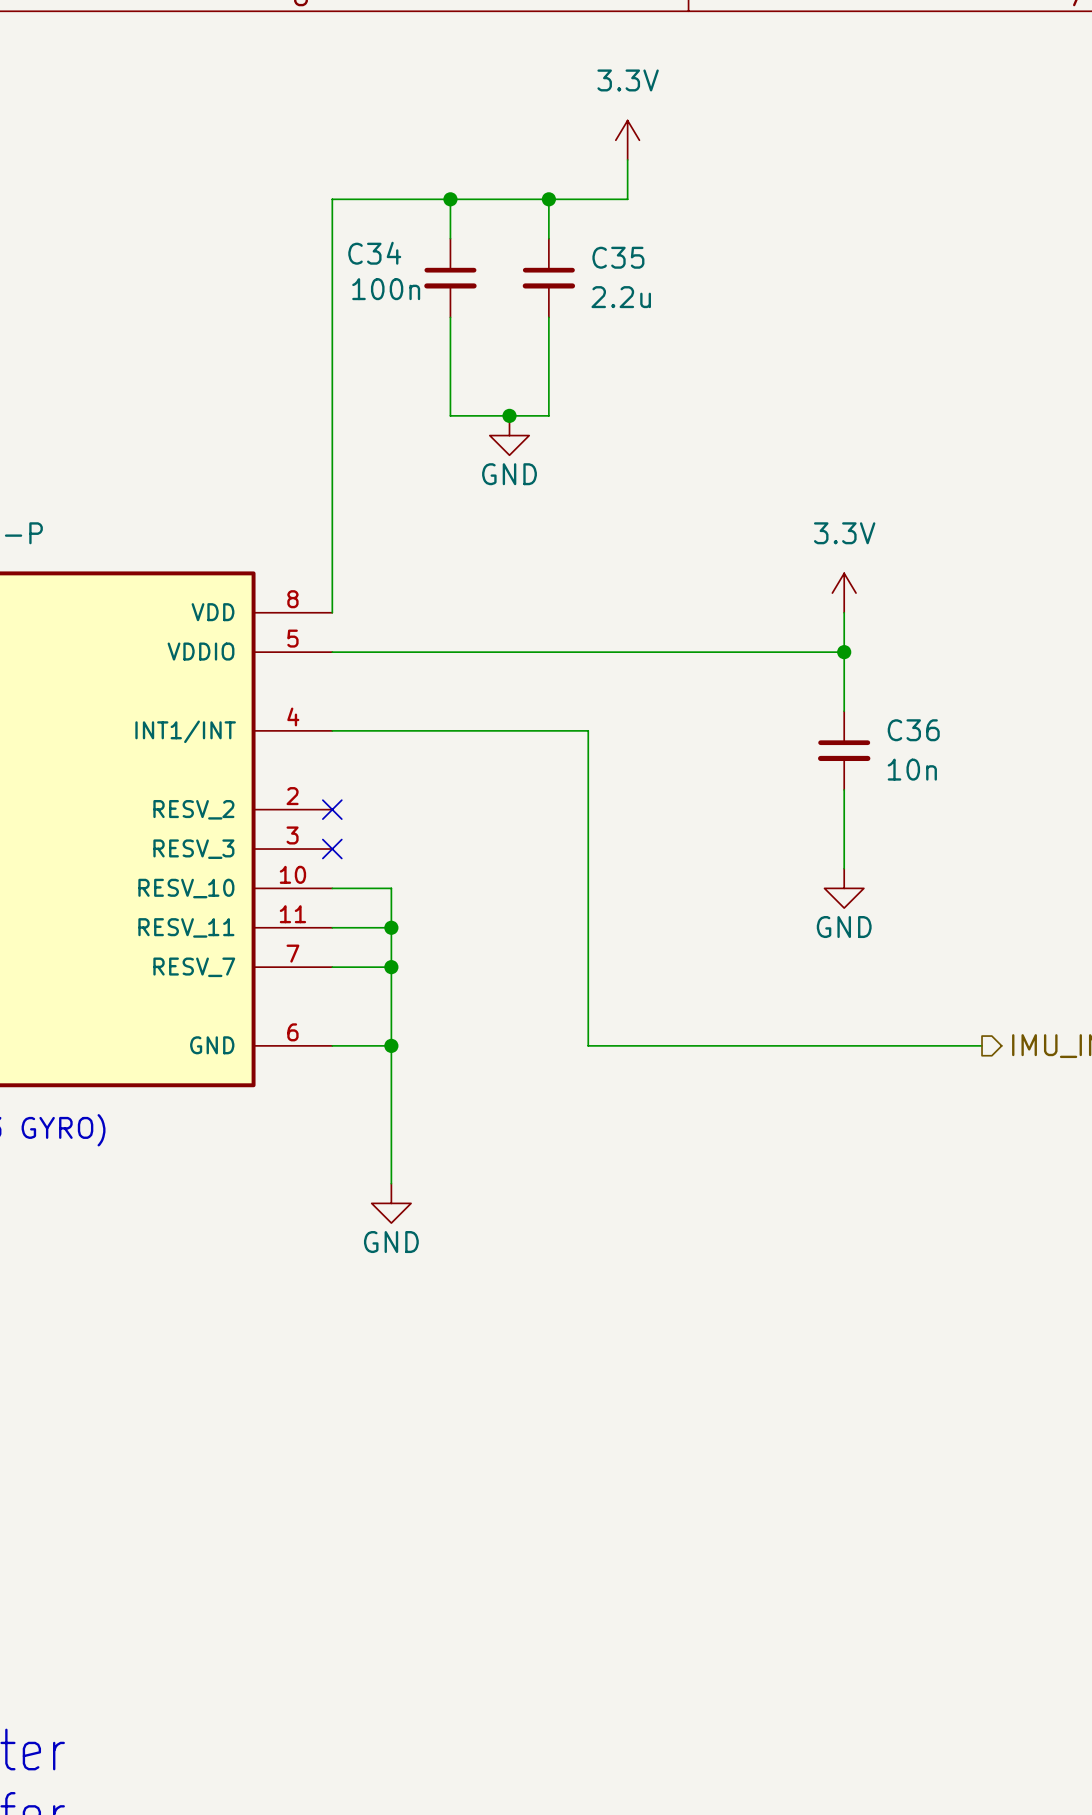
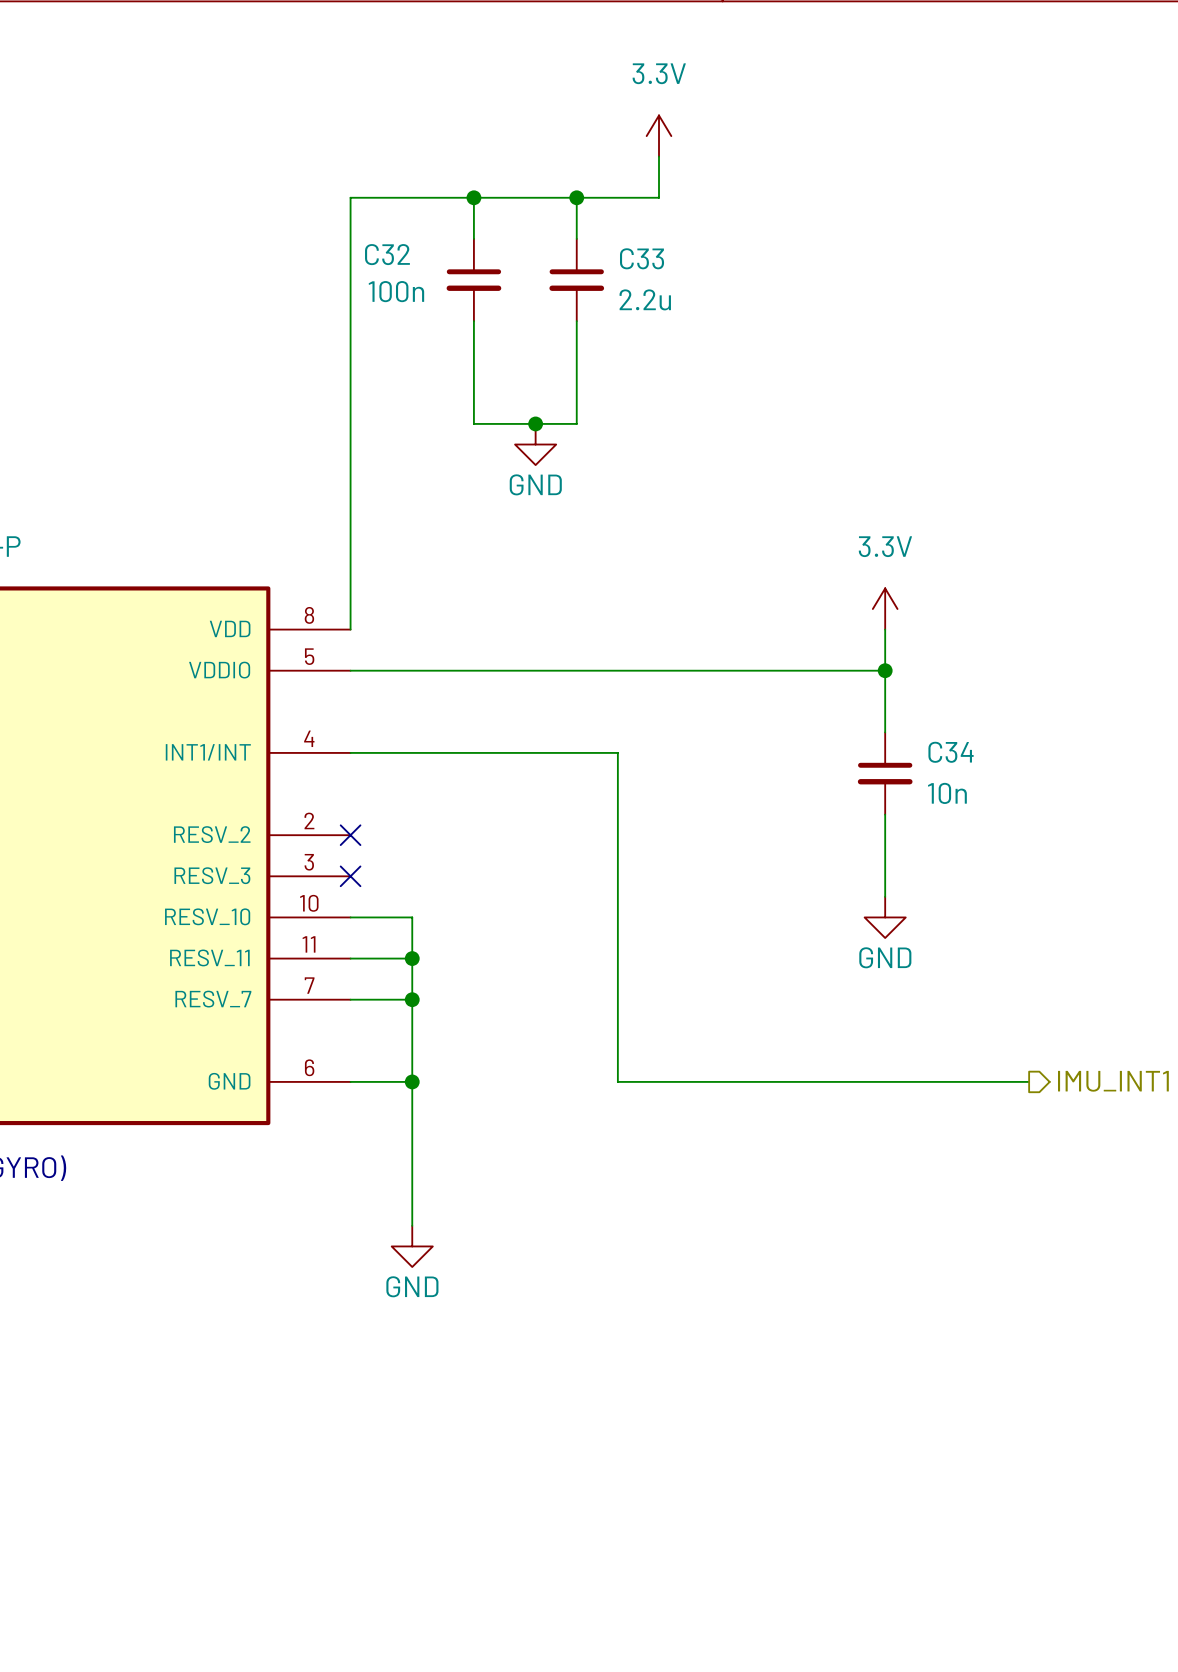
C34 name: C34 (374, 253) -> C32 (387, 254)
C35 name: C35 (618, 257) -> C33 (642, 258)
C36 name: C36 (913, 730) -> C34 (951, 752)

